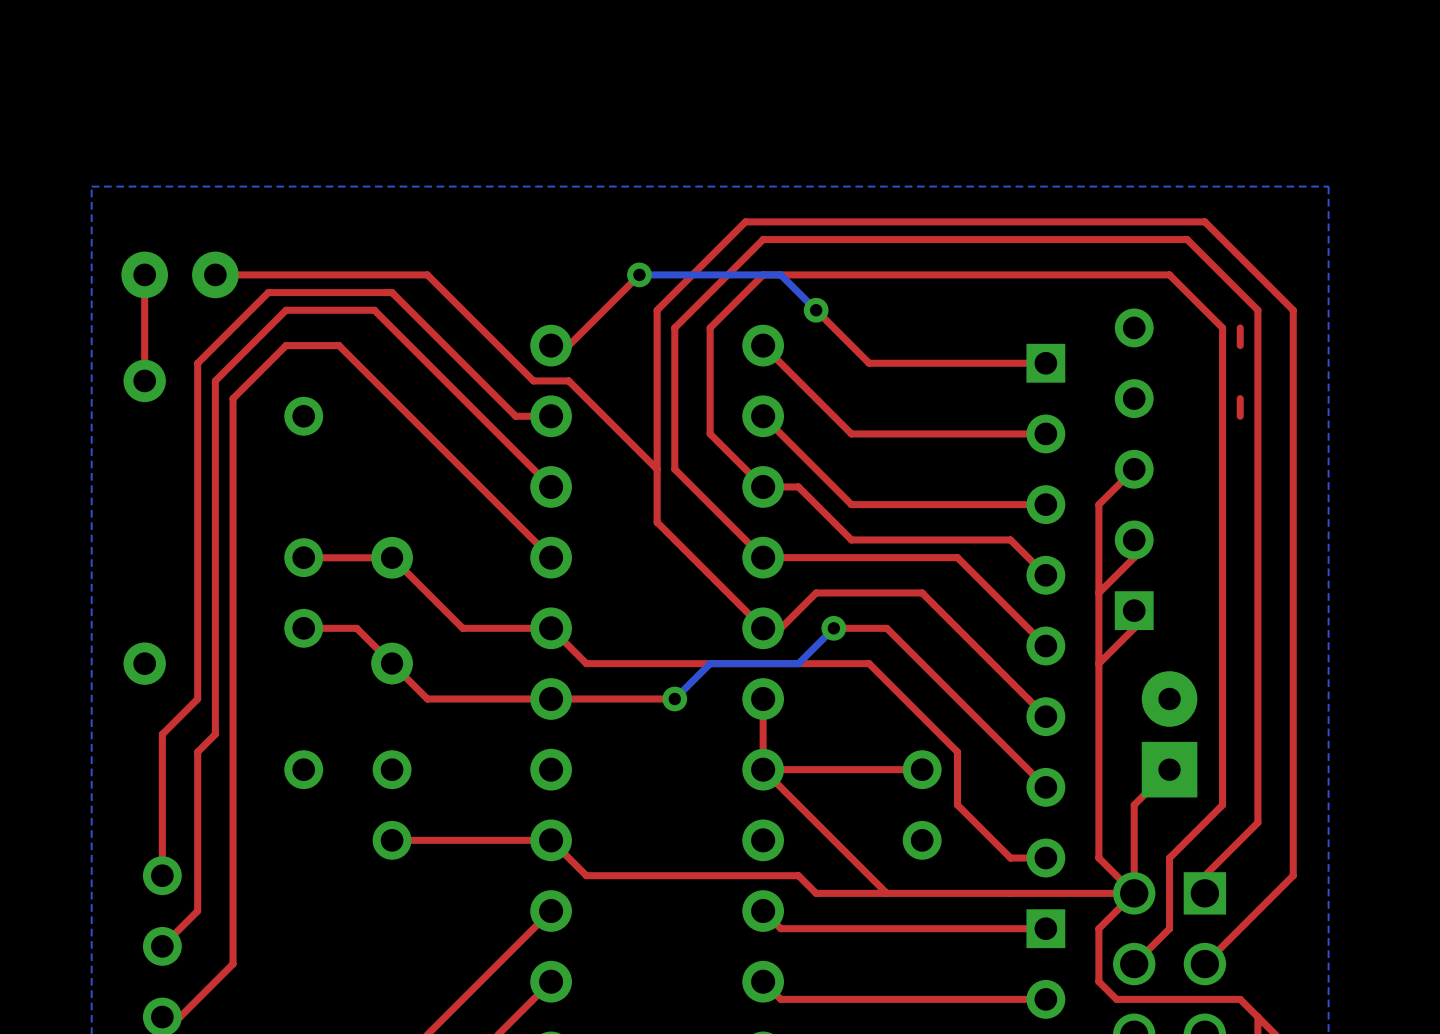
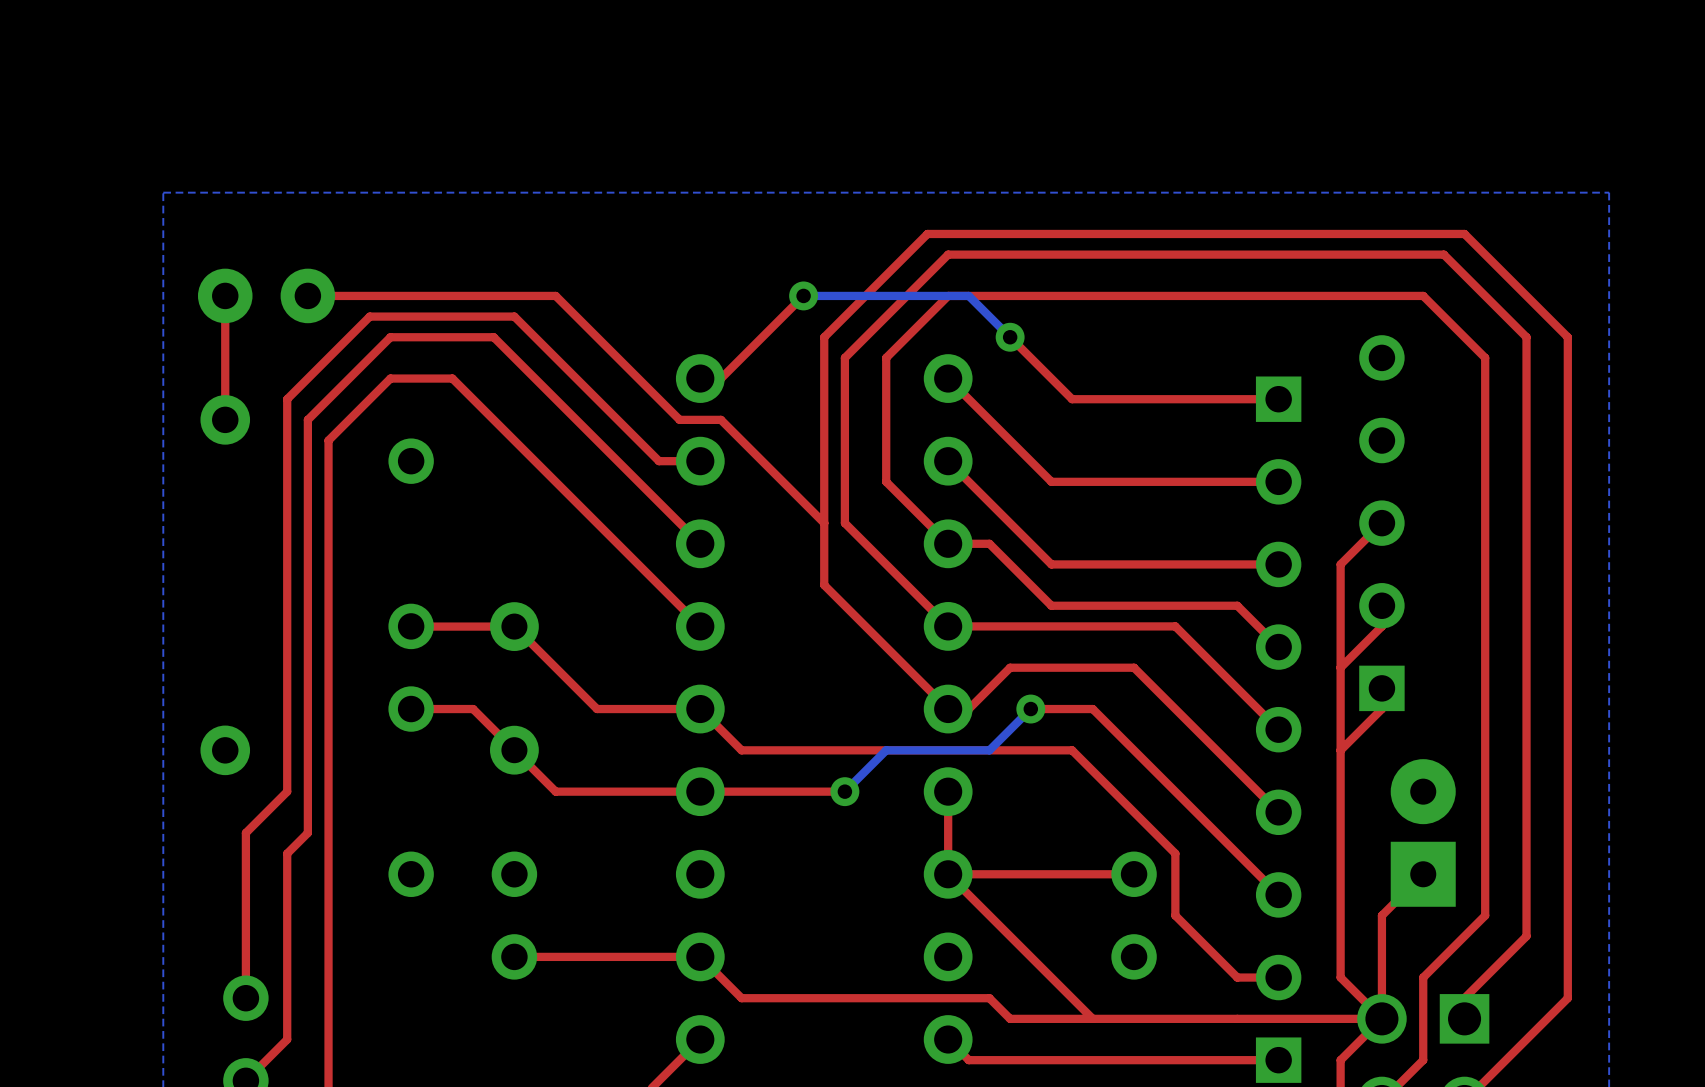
top track: (1240, 327) (1240, 345) -> none
top track: (1240, 398) (1240, 416) -> none

